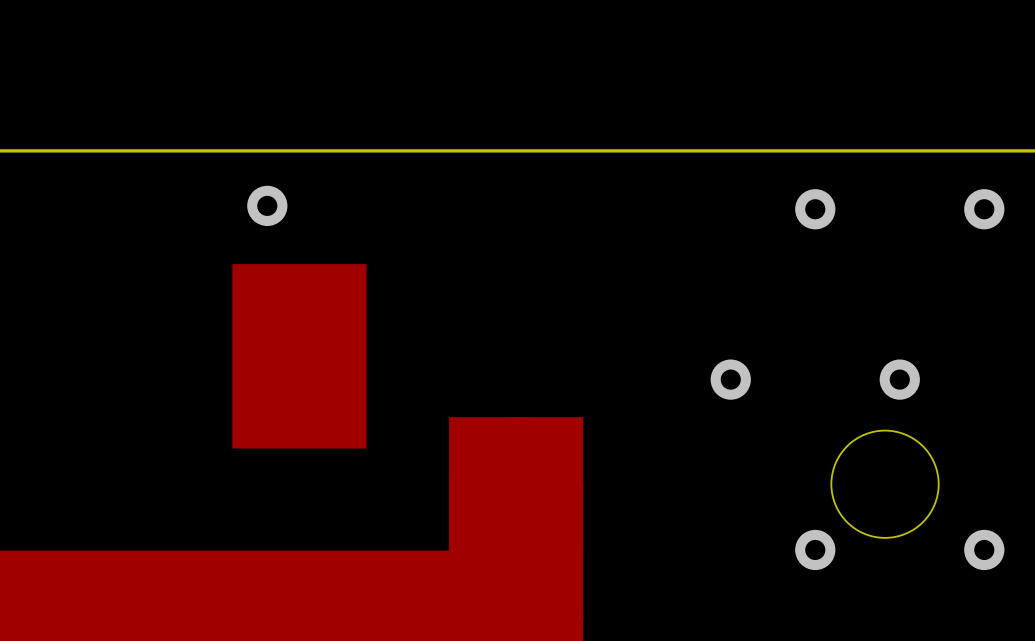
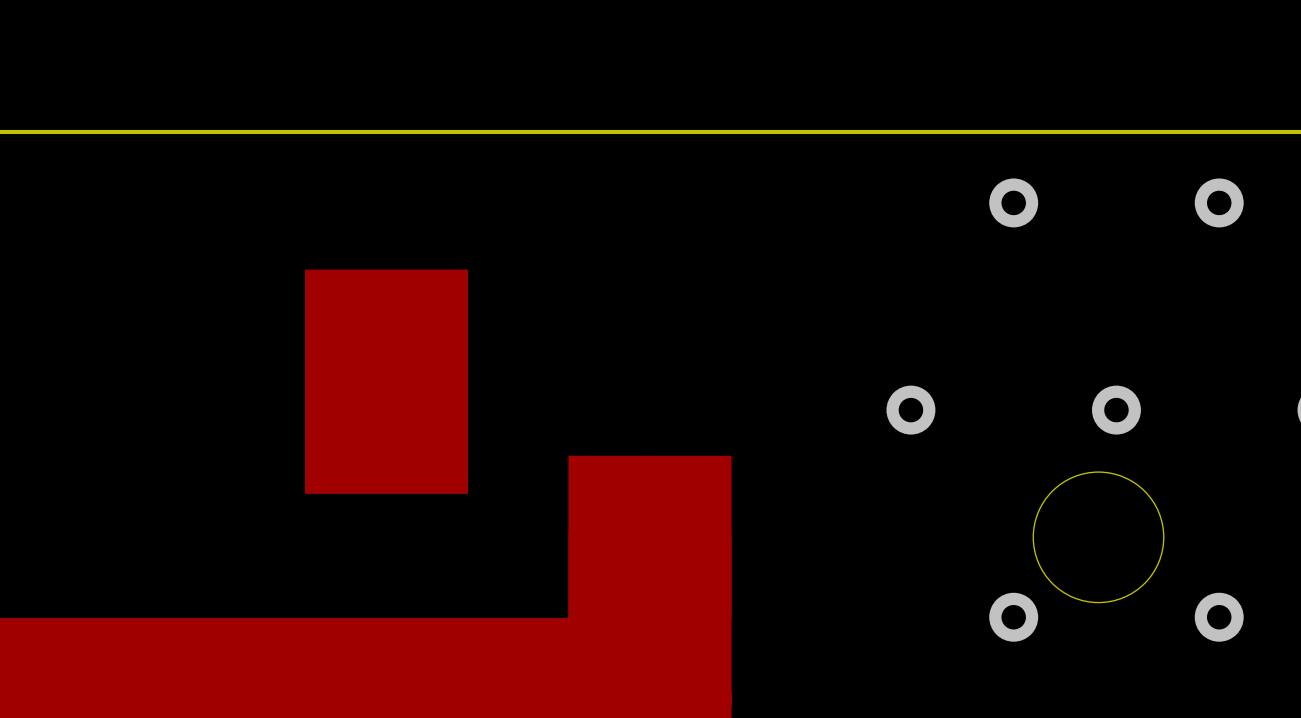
via: (267, 205) -> none

